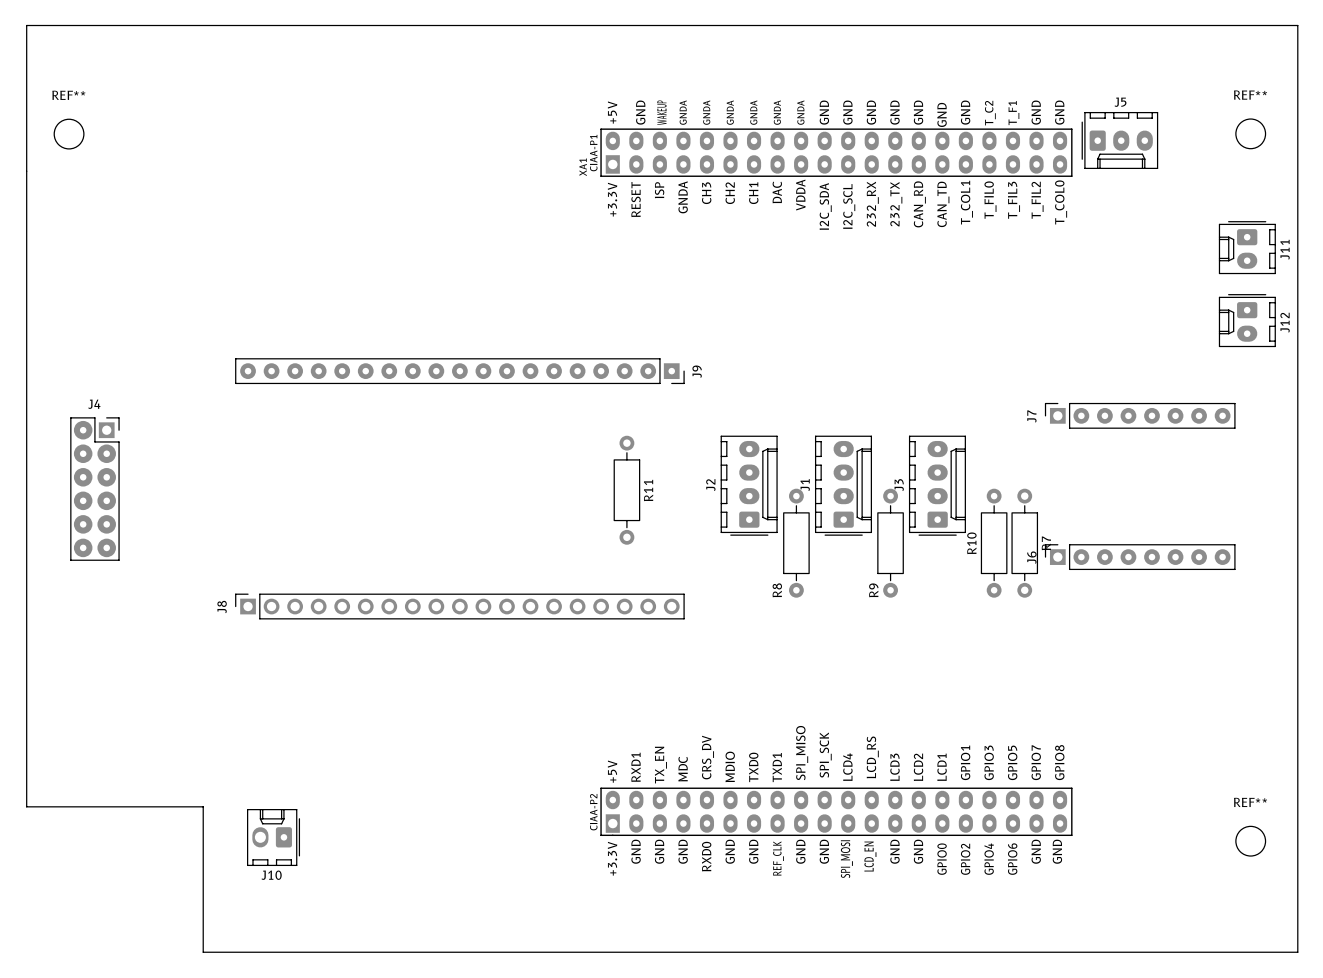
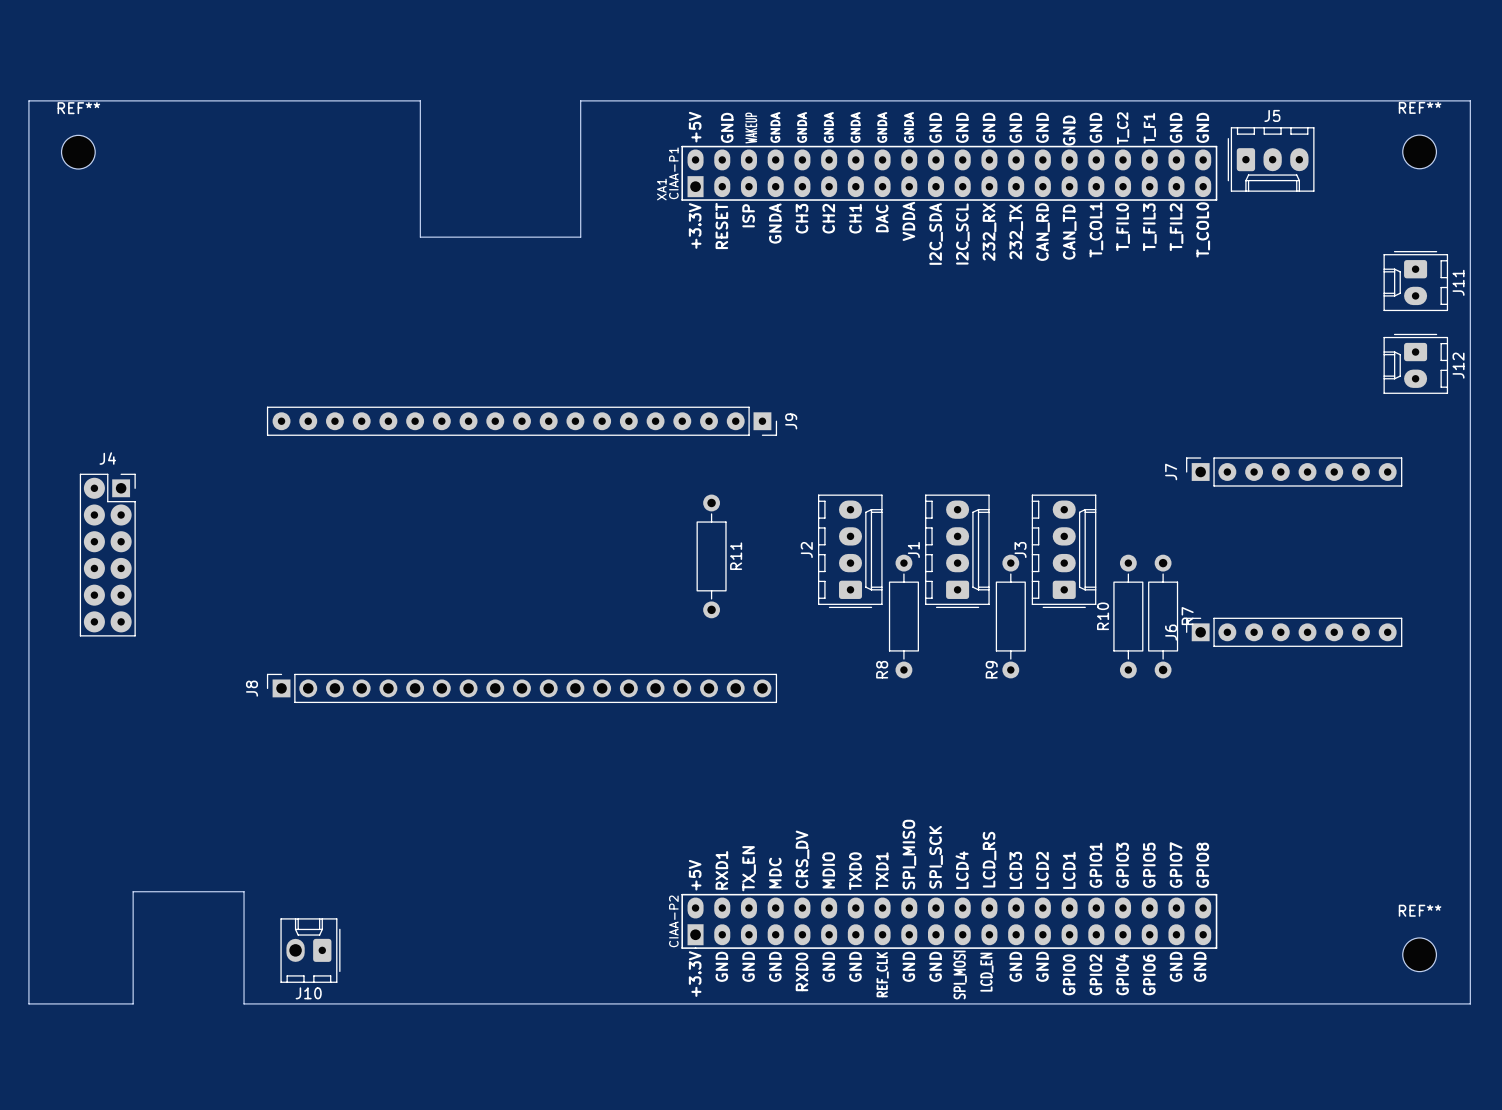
board edge: (26, 25) (26, 806) (203, 806) (203, 952) (1297, 952) (1297, 25) (26, 25) -> (28, 100) (28, 1003) (133, 1003) (133, 891) (244, 891) (244, 1003) (1470, 1003) (1470, 100) (580, 100) (580, 237) (420, 237) (420, 100) (28, 100)

